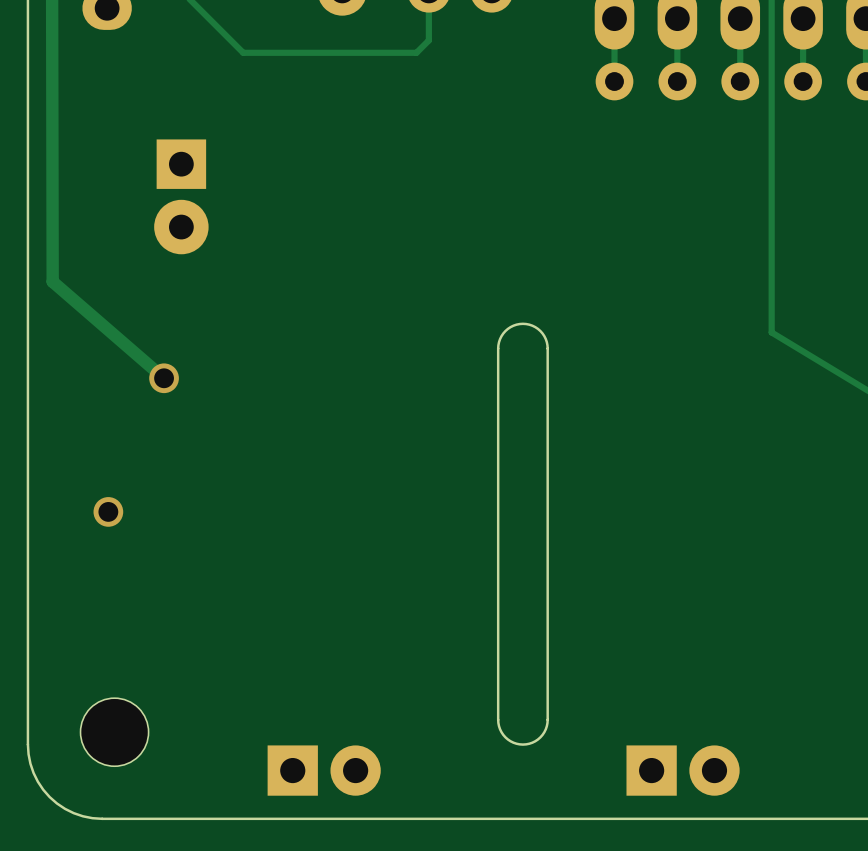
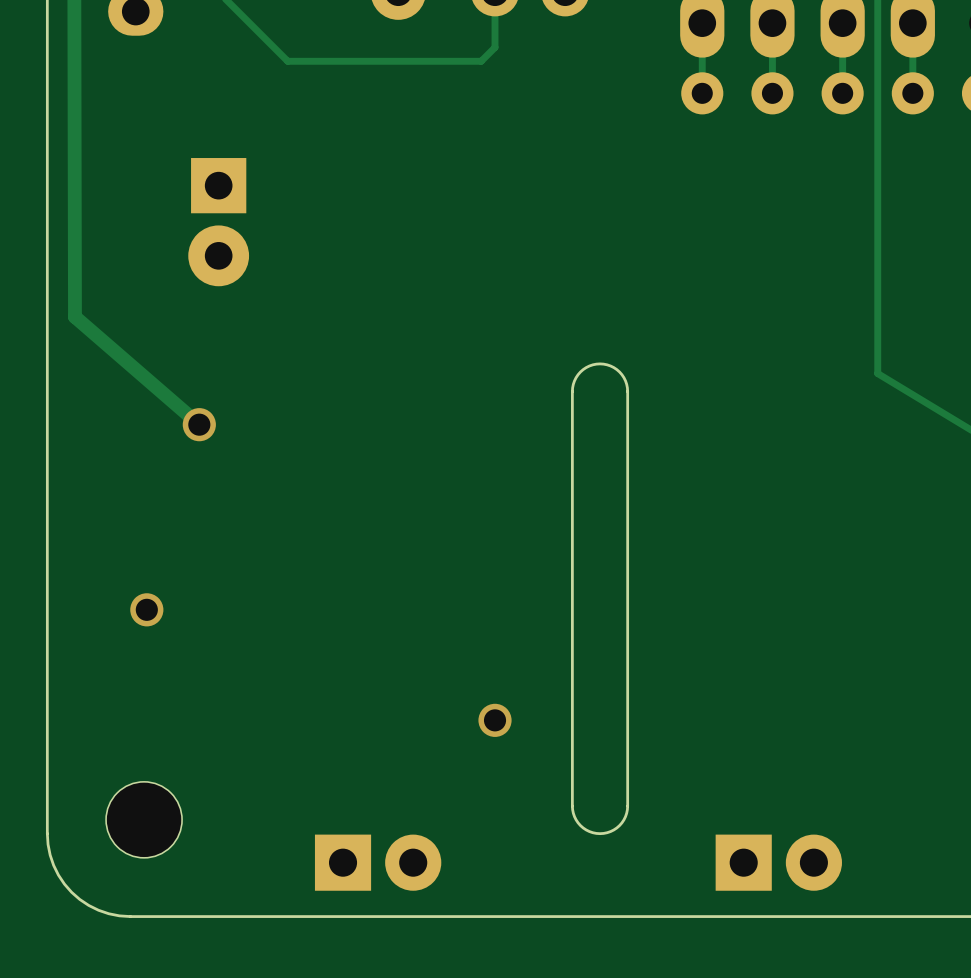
via position: (108, 511) -> (146, 609)
via: none -> (495, 720)

